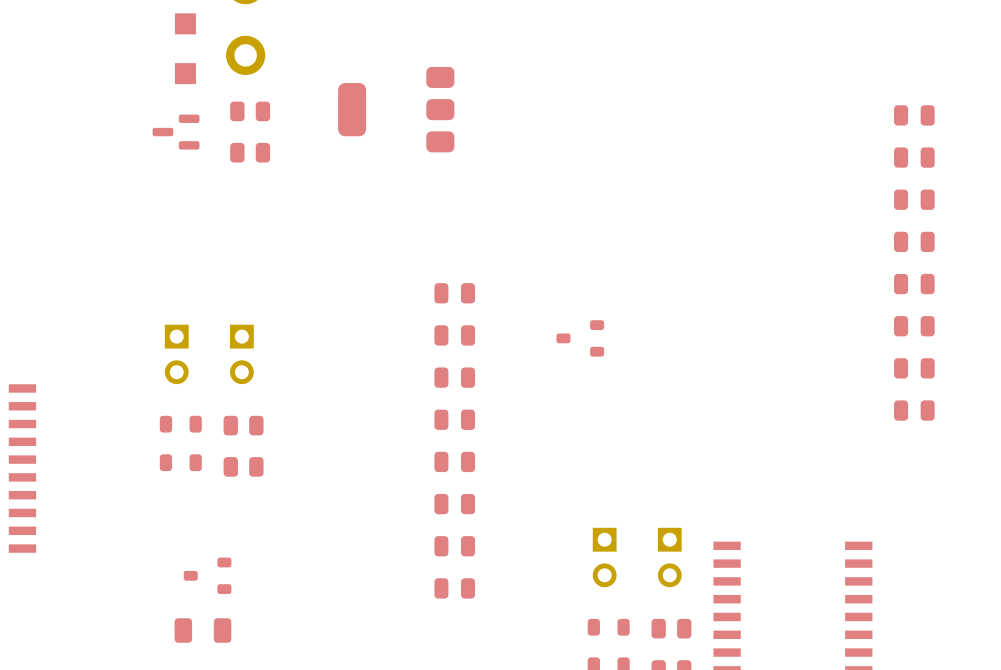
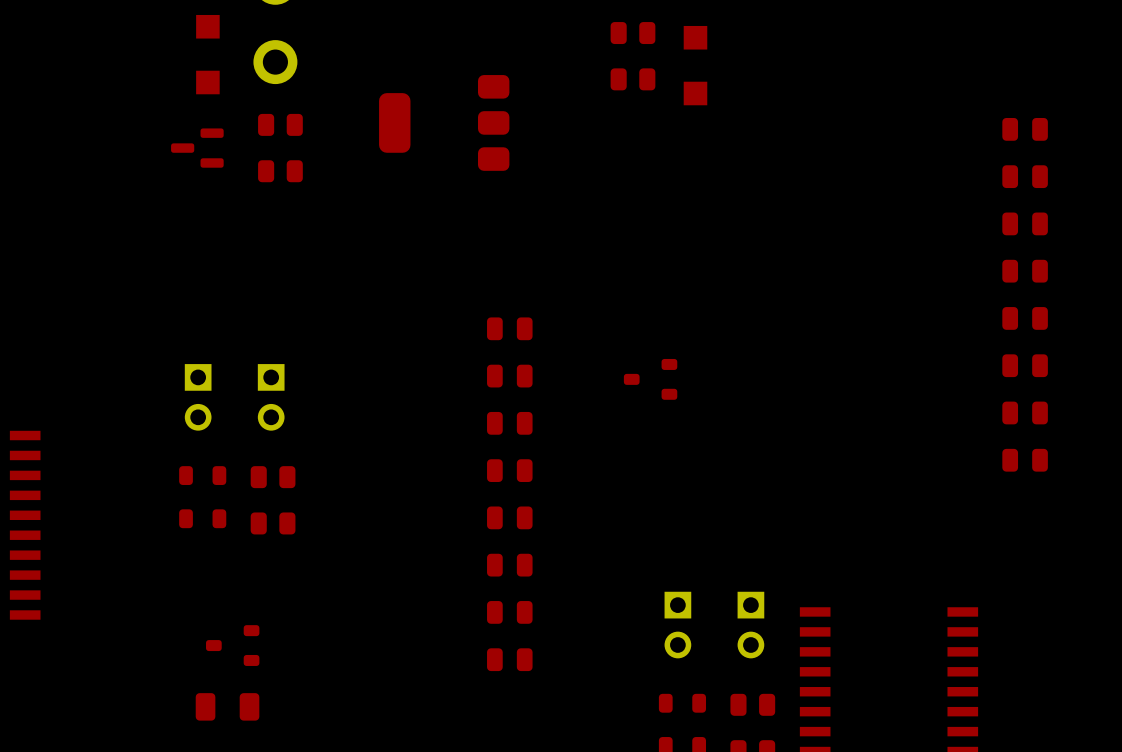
part: none -> (632, 33)
part: none -> (695, 37)
part: none -> (632, 79)
part: none -> (695, 93)

